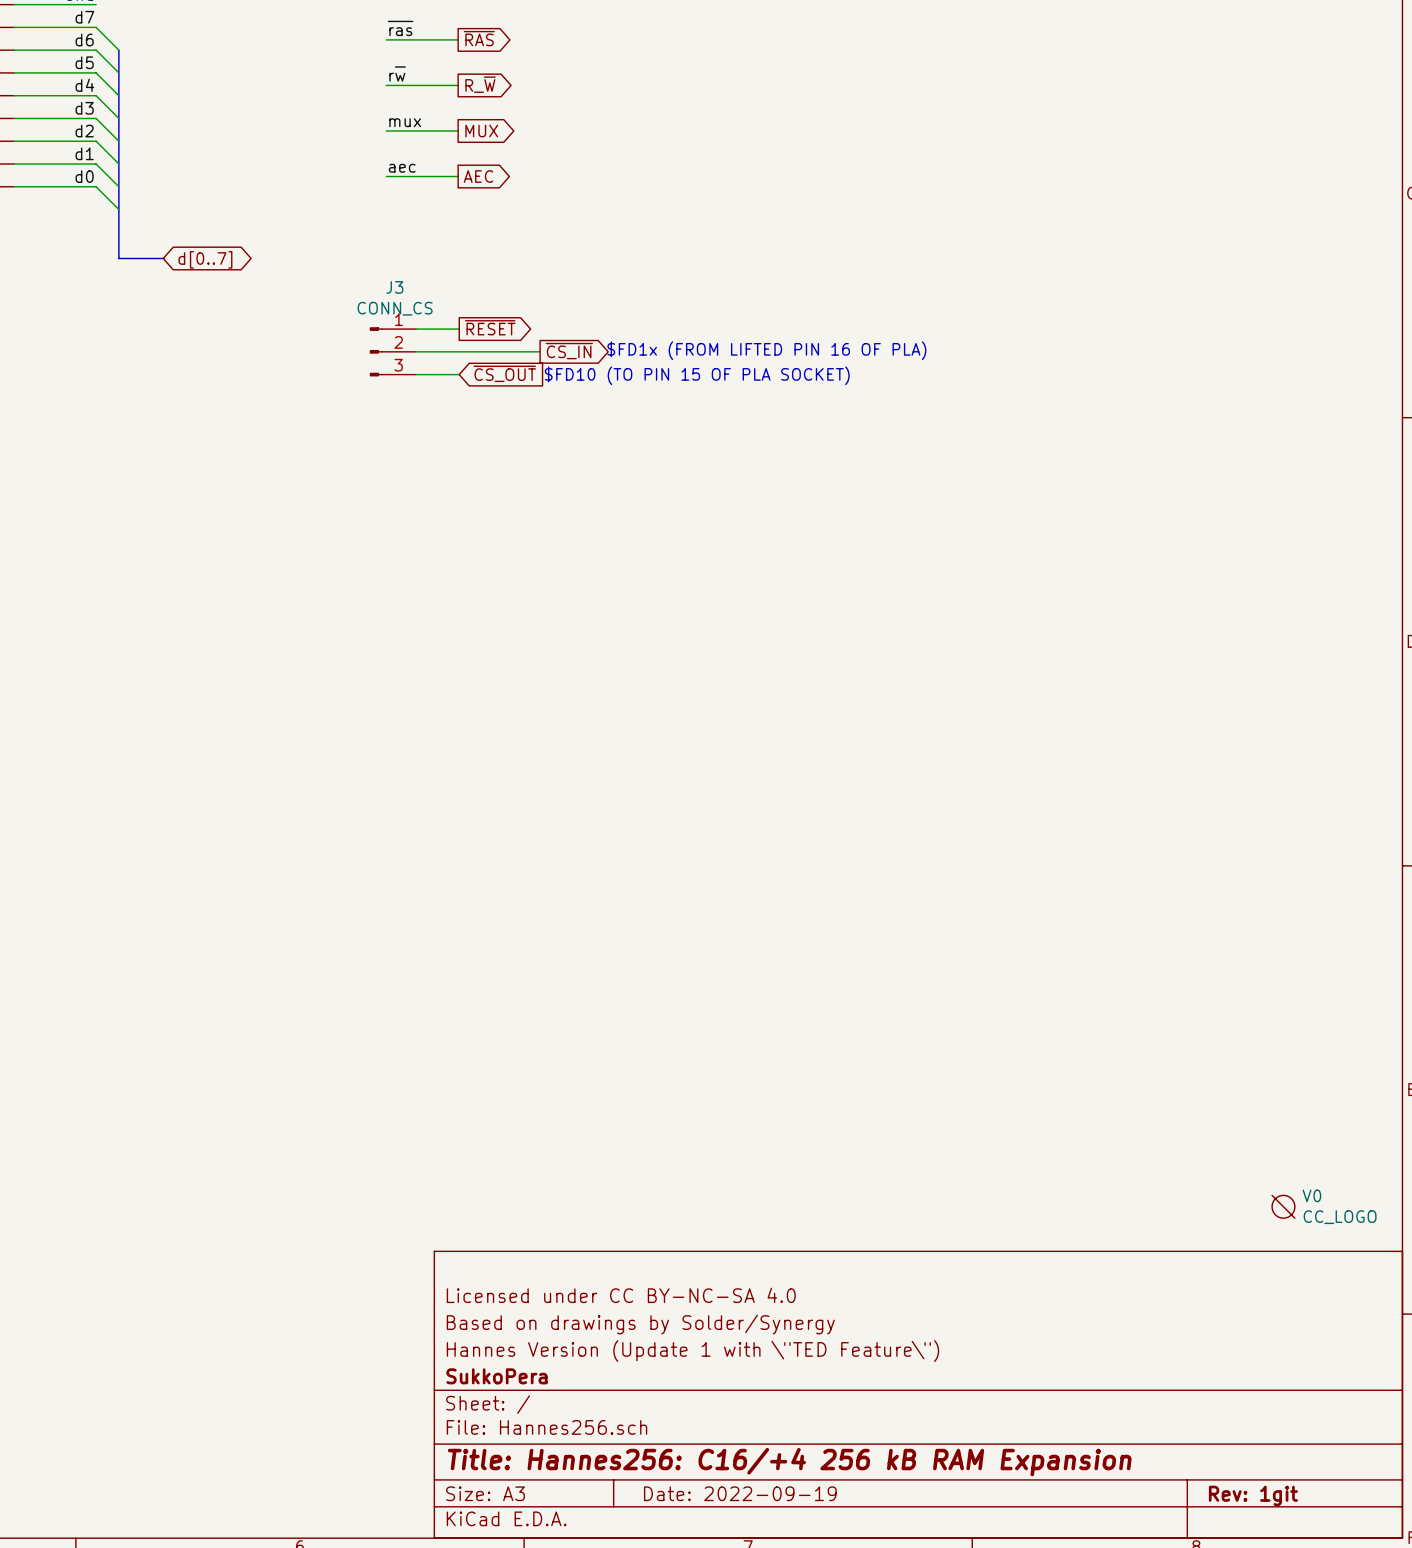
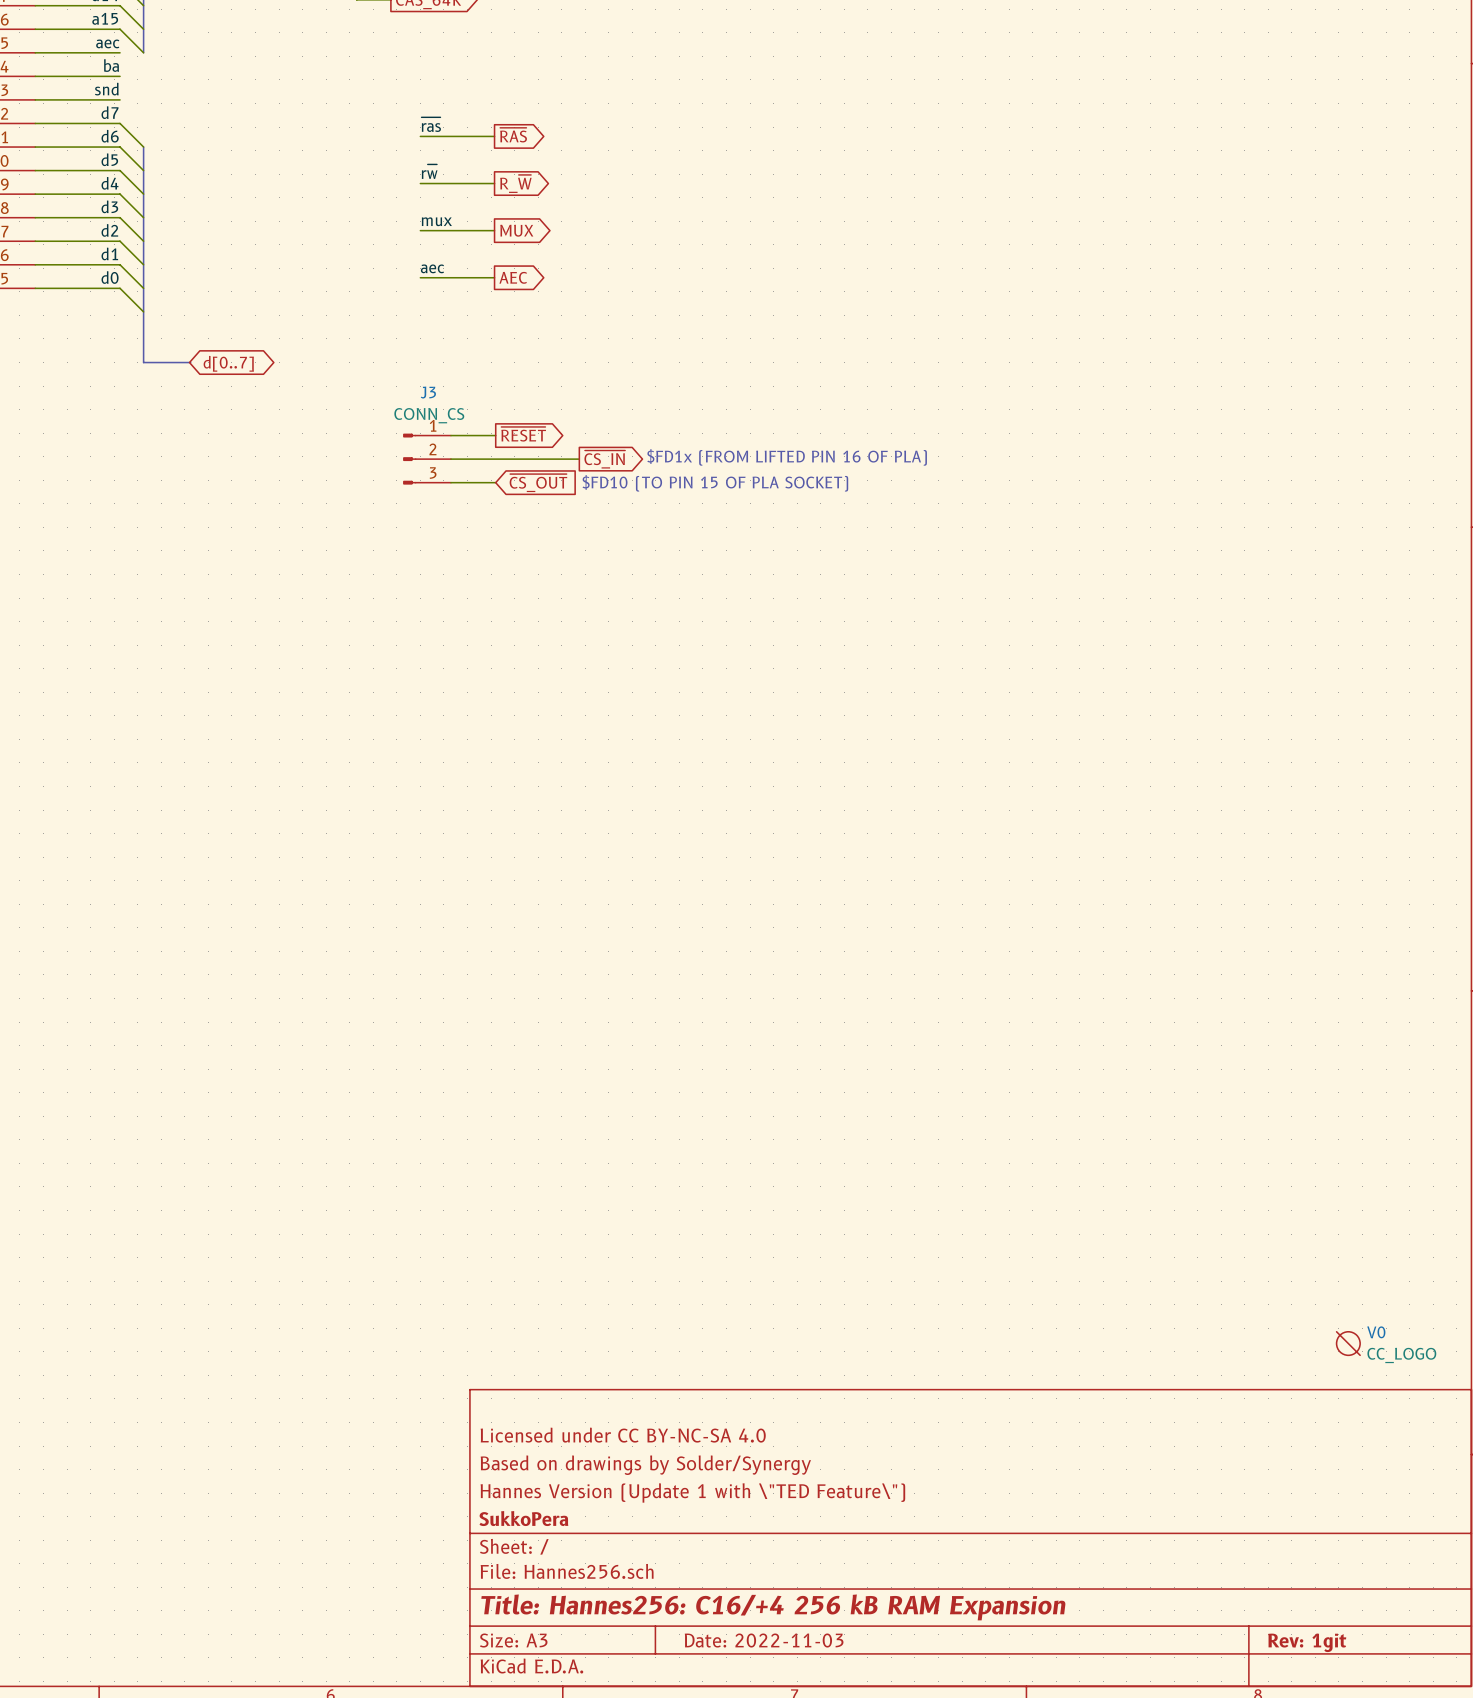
title block: Date: 2022-09-19 (740, 1493) -> Date: 2022-11-03 (764, 1640)

